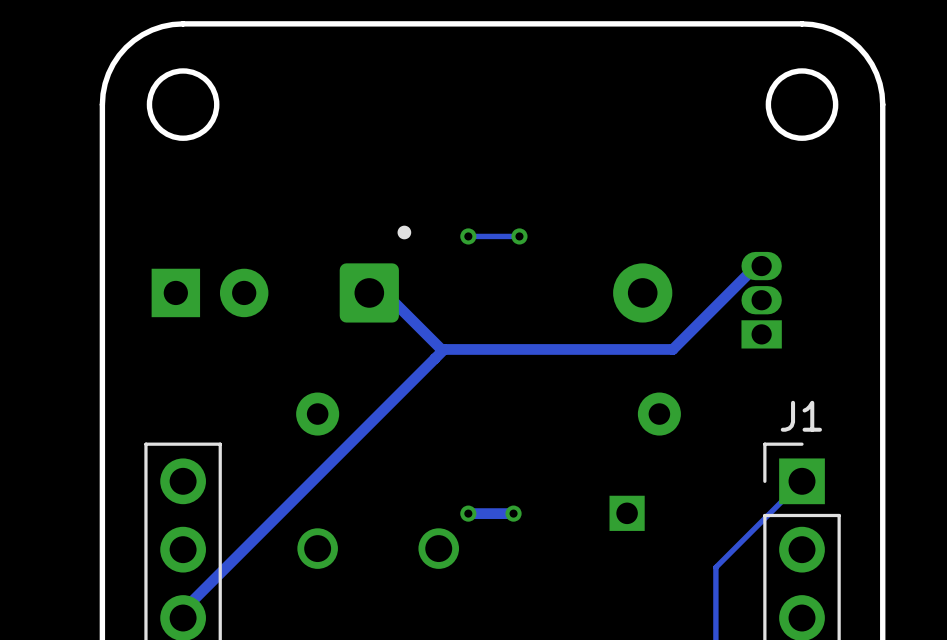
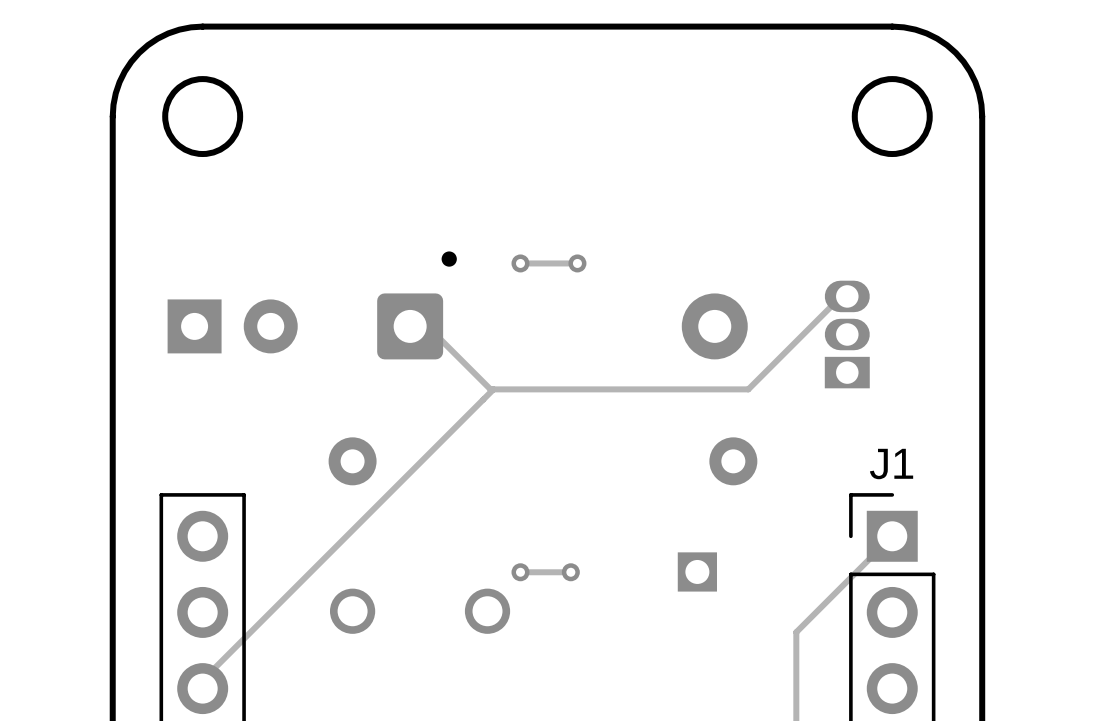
track width: thick (761, 266) (756, 266) (672, 349) (441, 349) (384, 292) (369, 292) -> thin (847, 296) (841, 296) (748, 389) (490, 389) (427, 326) (410, 326)
track width: thick (444, 349) (183, 610) -> thin (493, 389) (202, 680)
track width: thick (513, 513) (468, 513) -> thin (570, 572) (520, 572)

